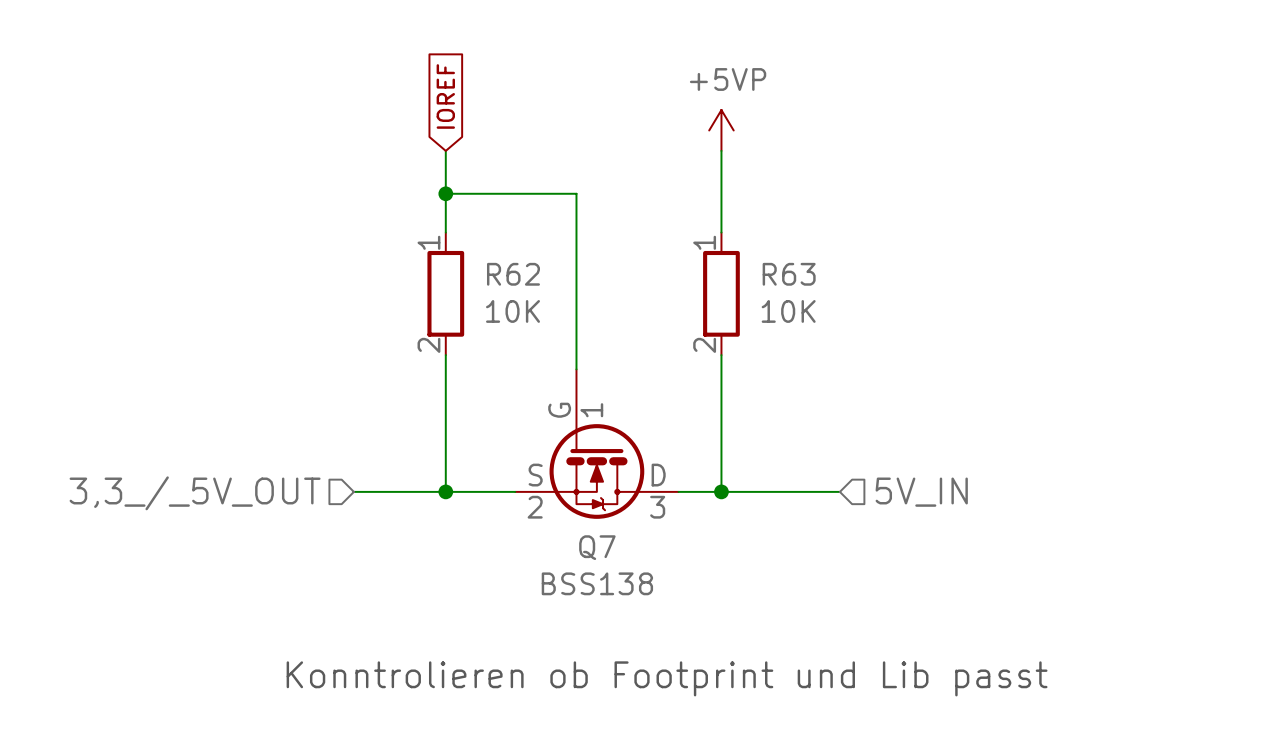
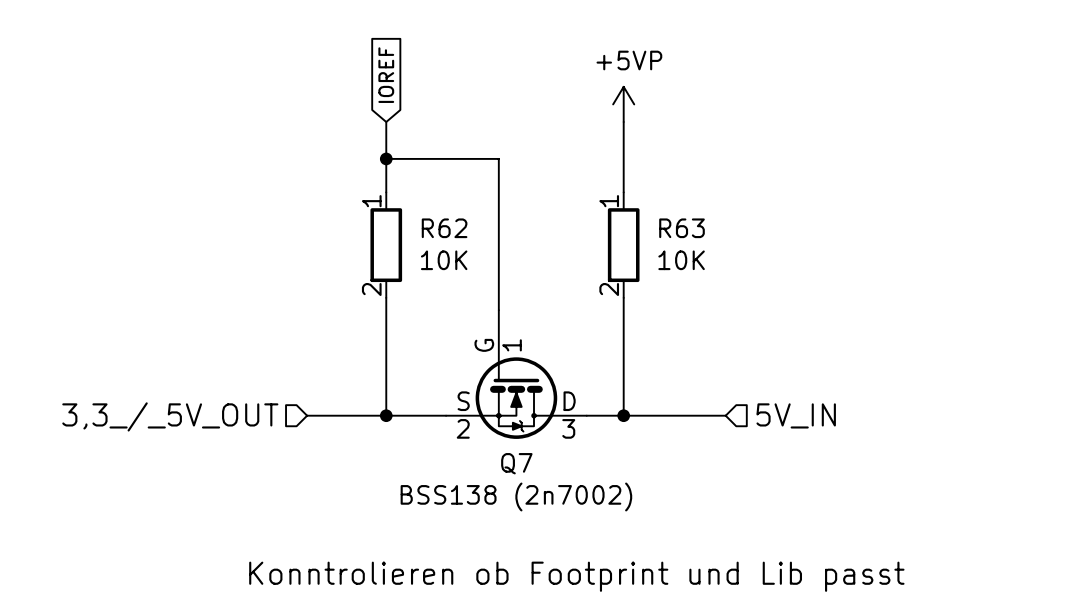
Q7 value: BSS138 (597, 583) -> BSS138 (2n7002) (516, 496)

